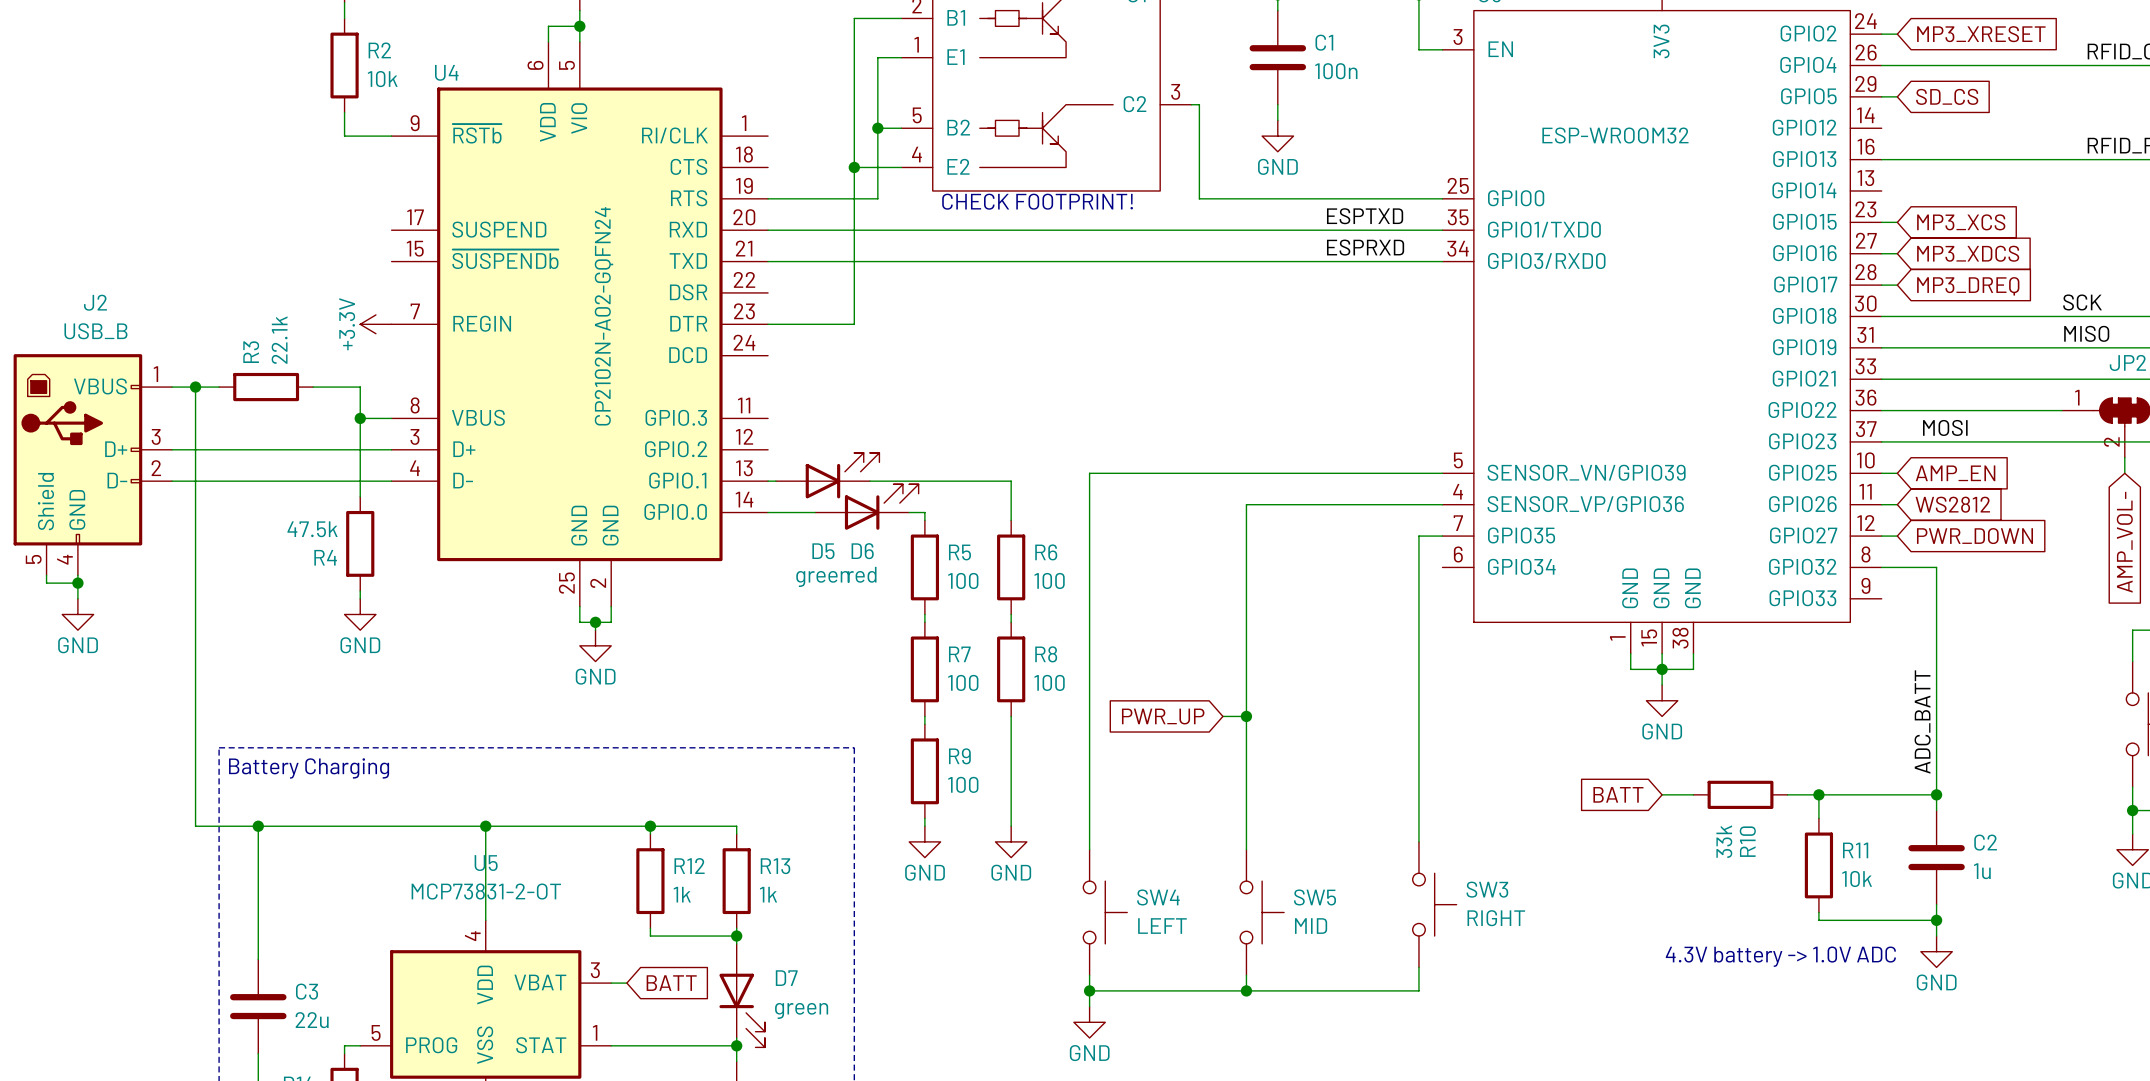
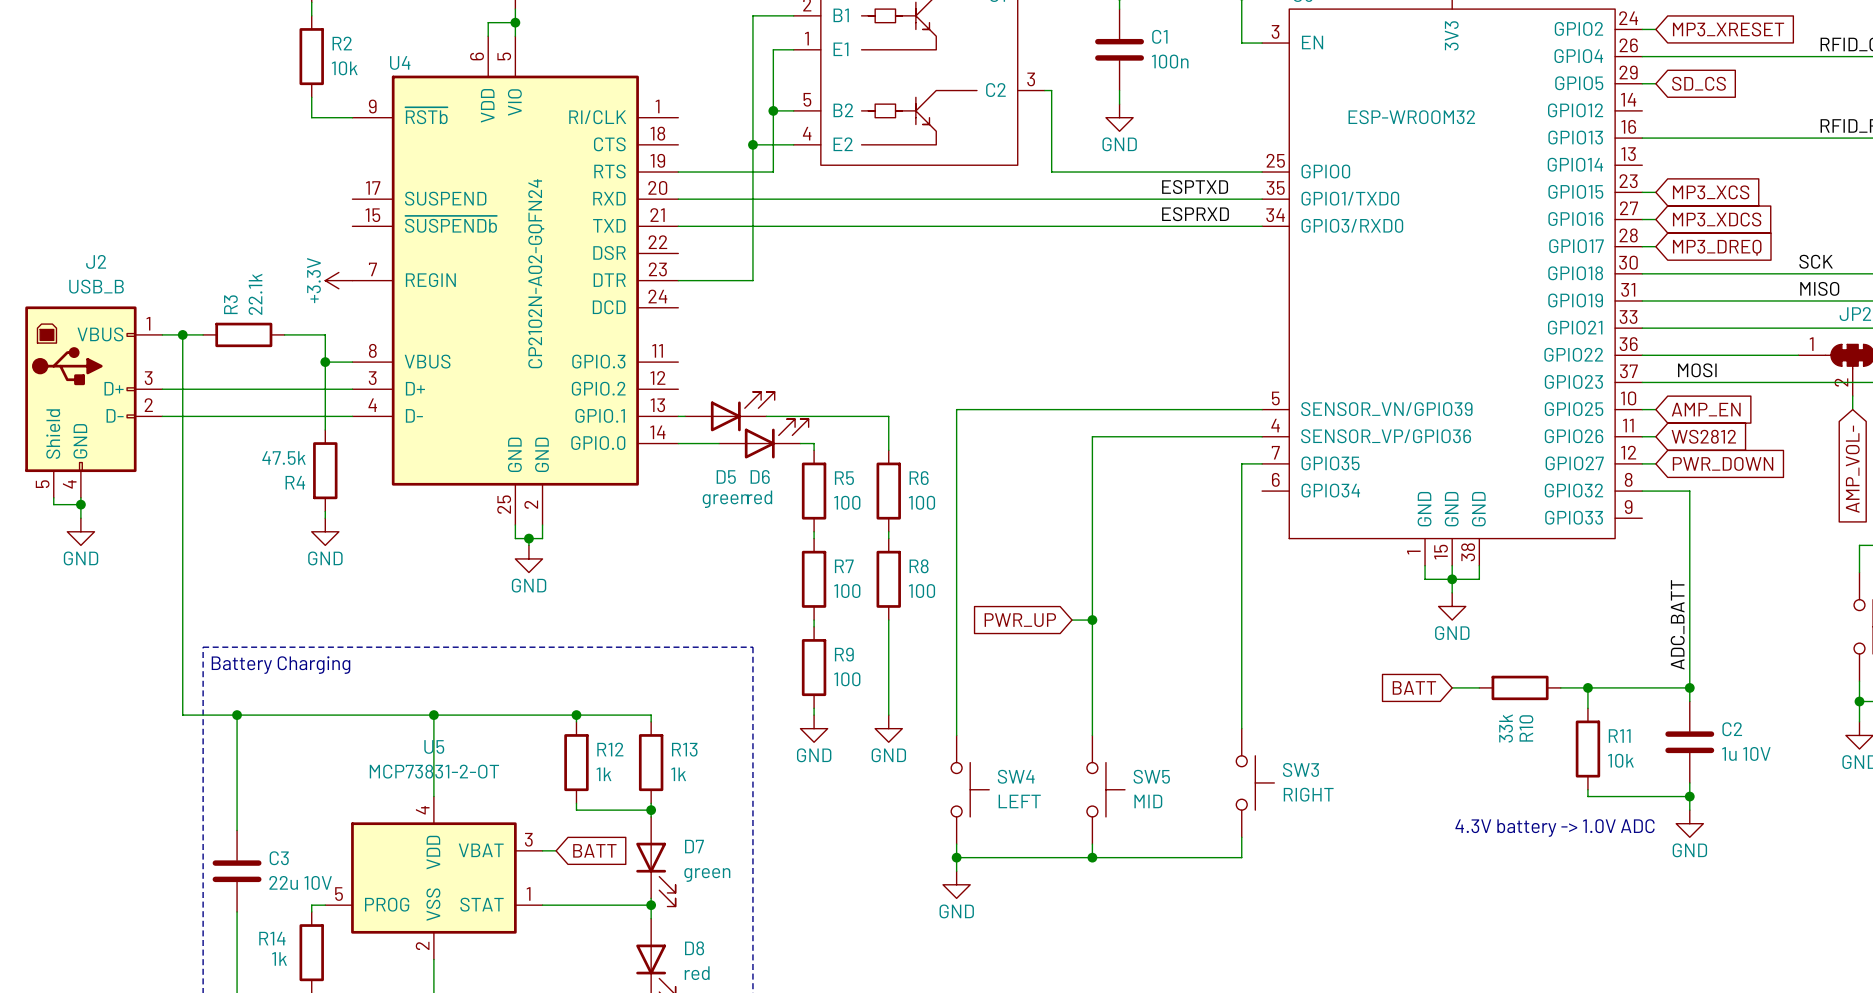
text: CHECK FOOTPRINT! (1037, 201) -> none
C2 value: 1u (1982, 871) -> 1u 10V (1746, 753)
C3 value: 22u (312, 1020) -> 22u 10V (300, 882)

